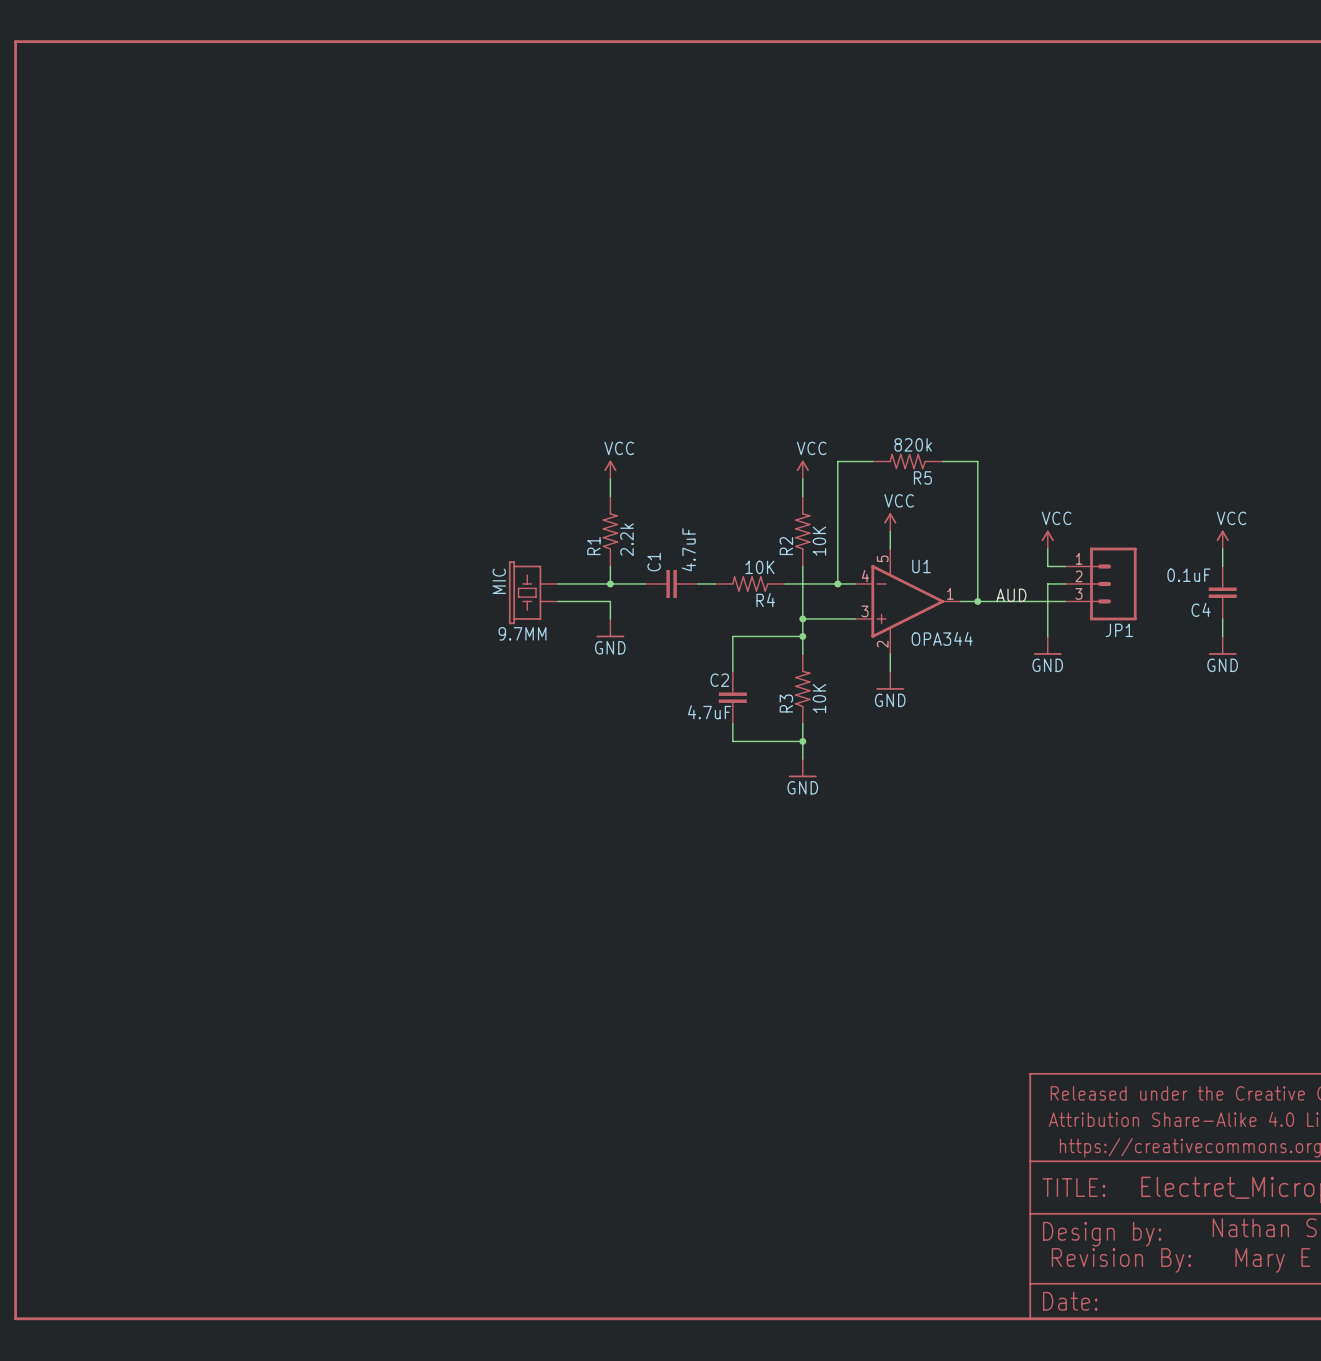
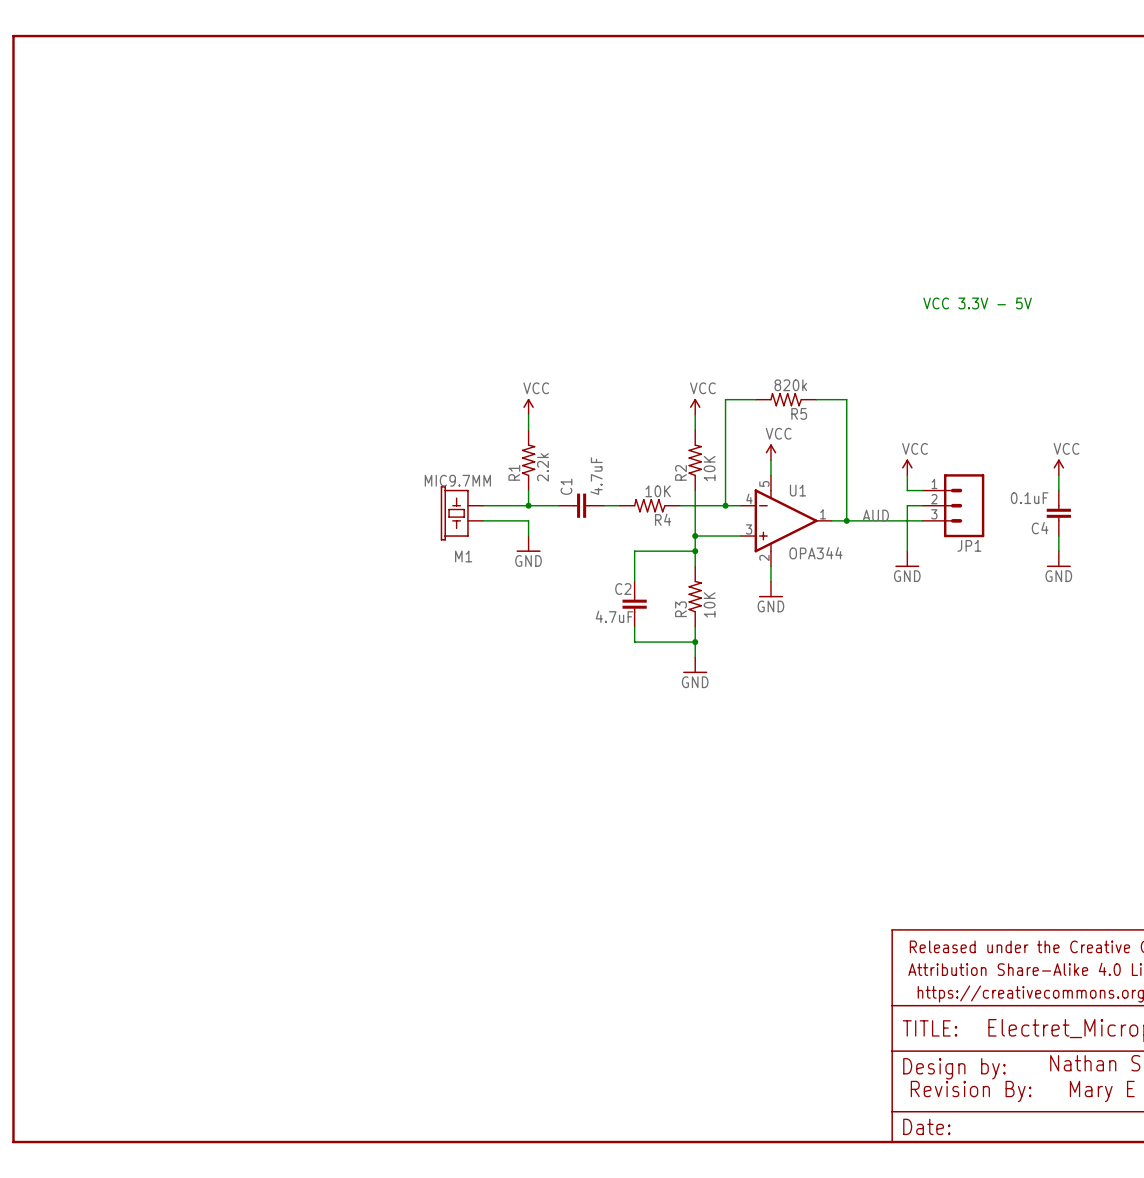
text: none -> VCC 3.3V - 5V (977, 303)
M1 value: none -> MIC9.7MM (457, 480)
M1 text: MIC (499, 581) -> none
M1 text: 9.7MM (522, 633) -> none
M1 name: none -> M1 (463, 556)

